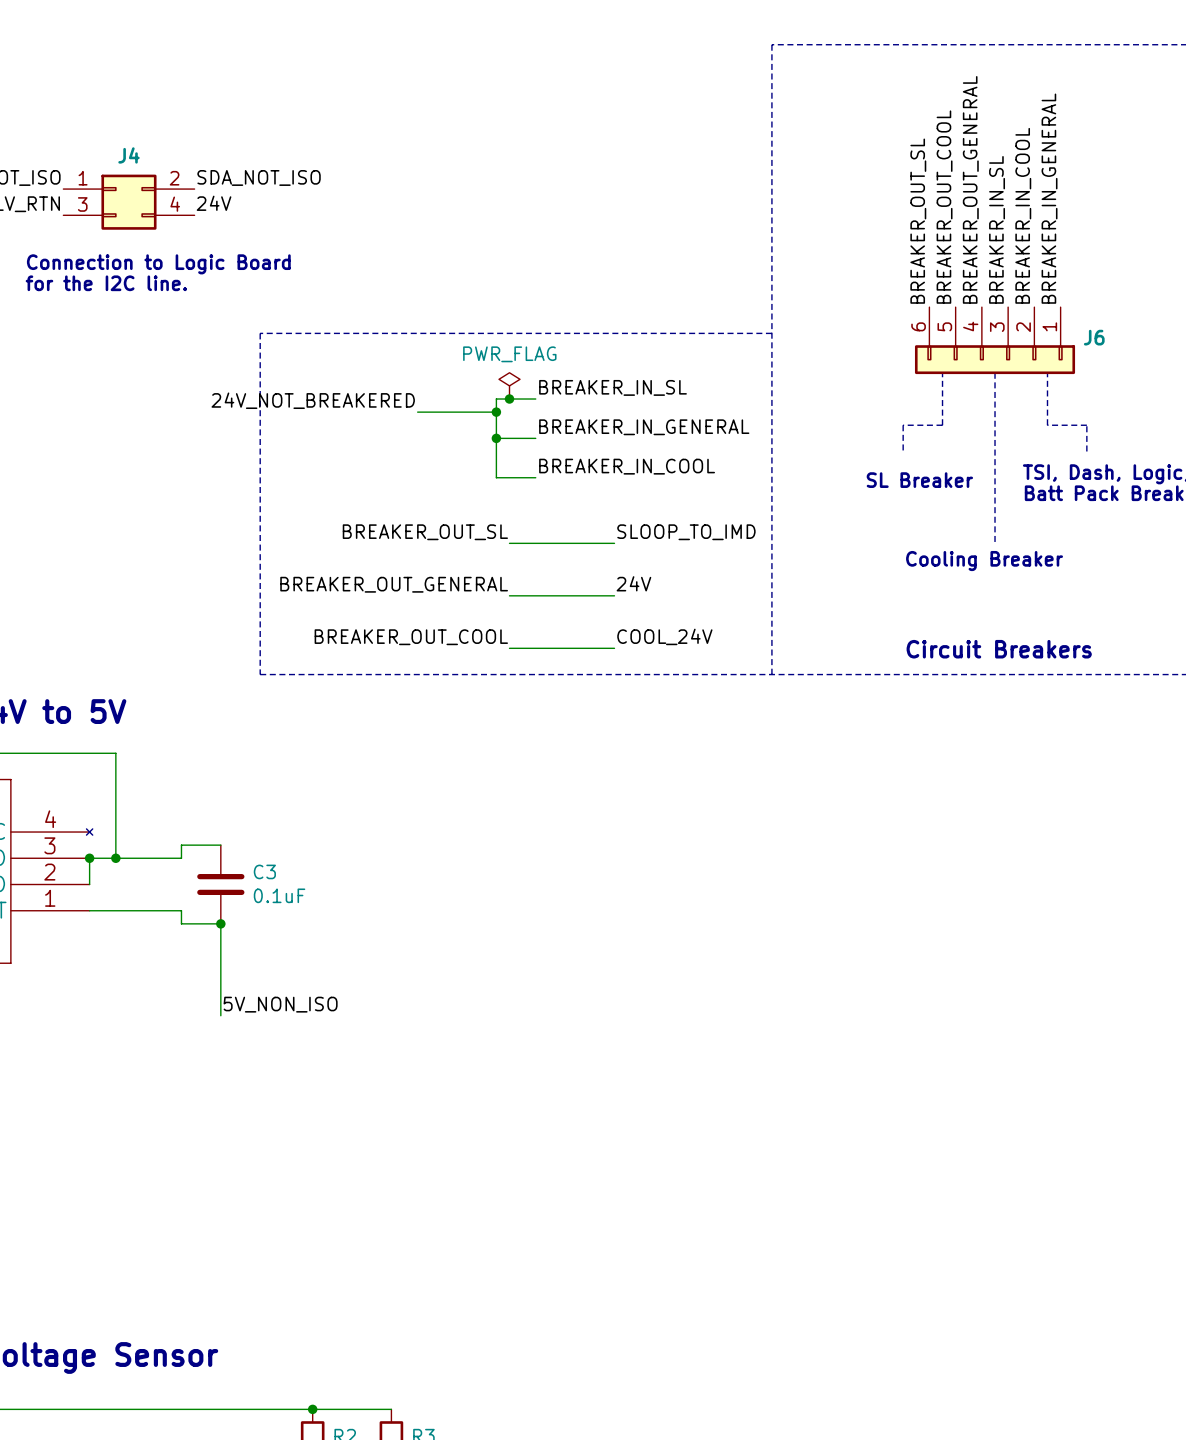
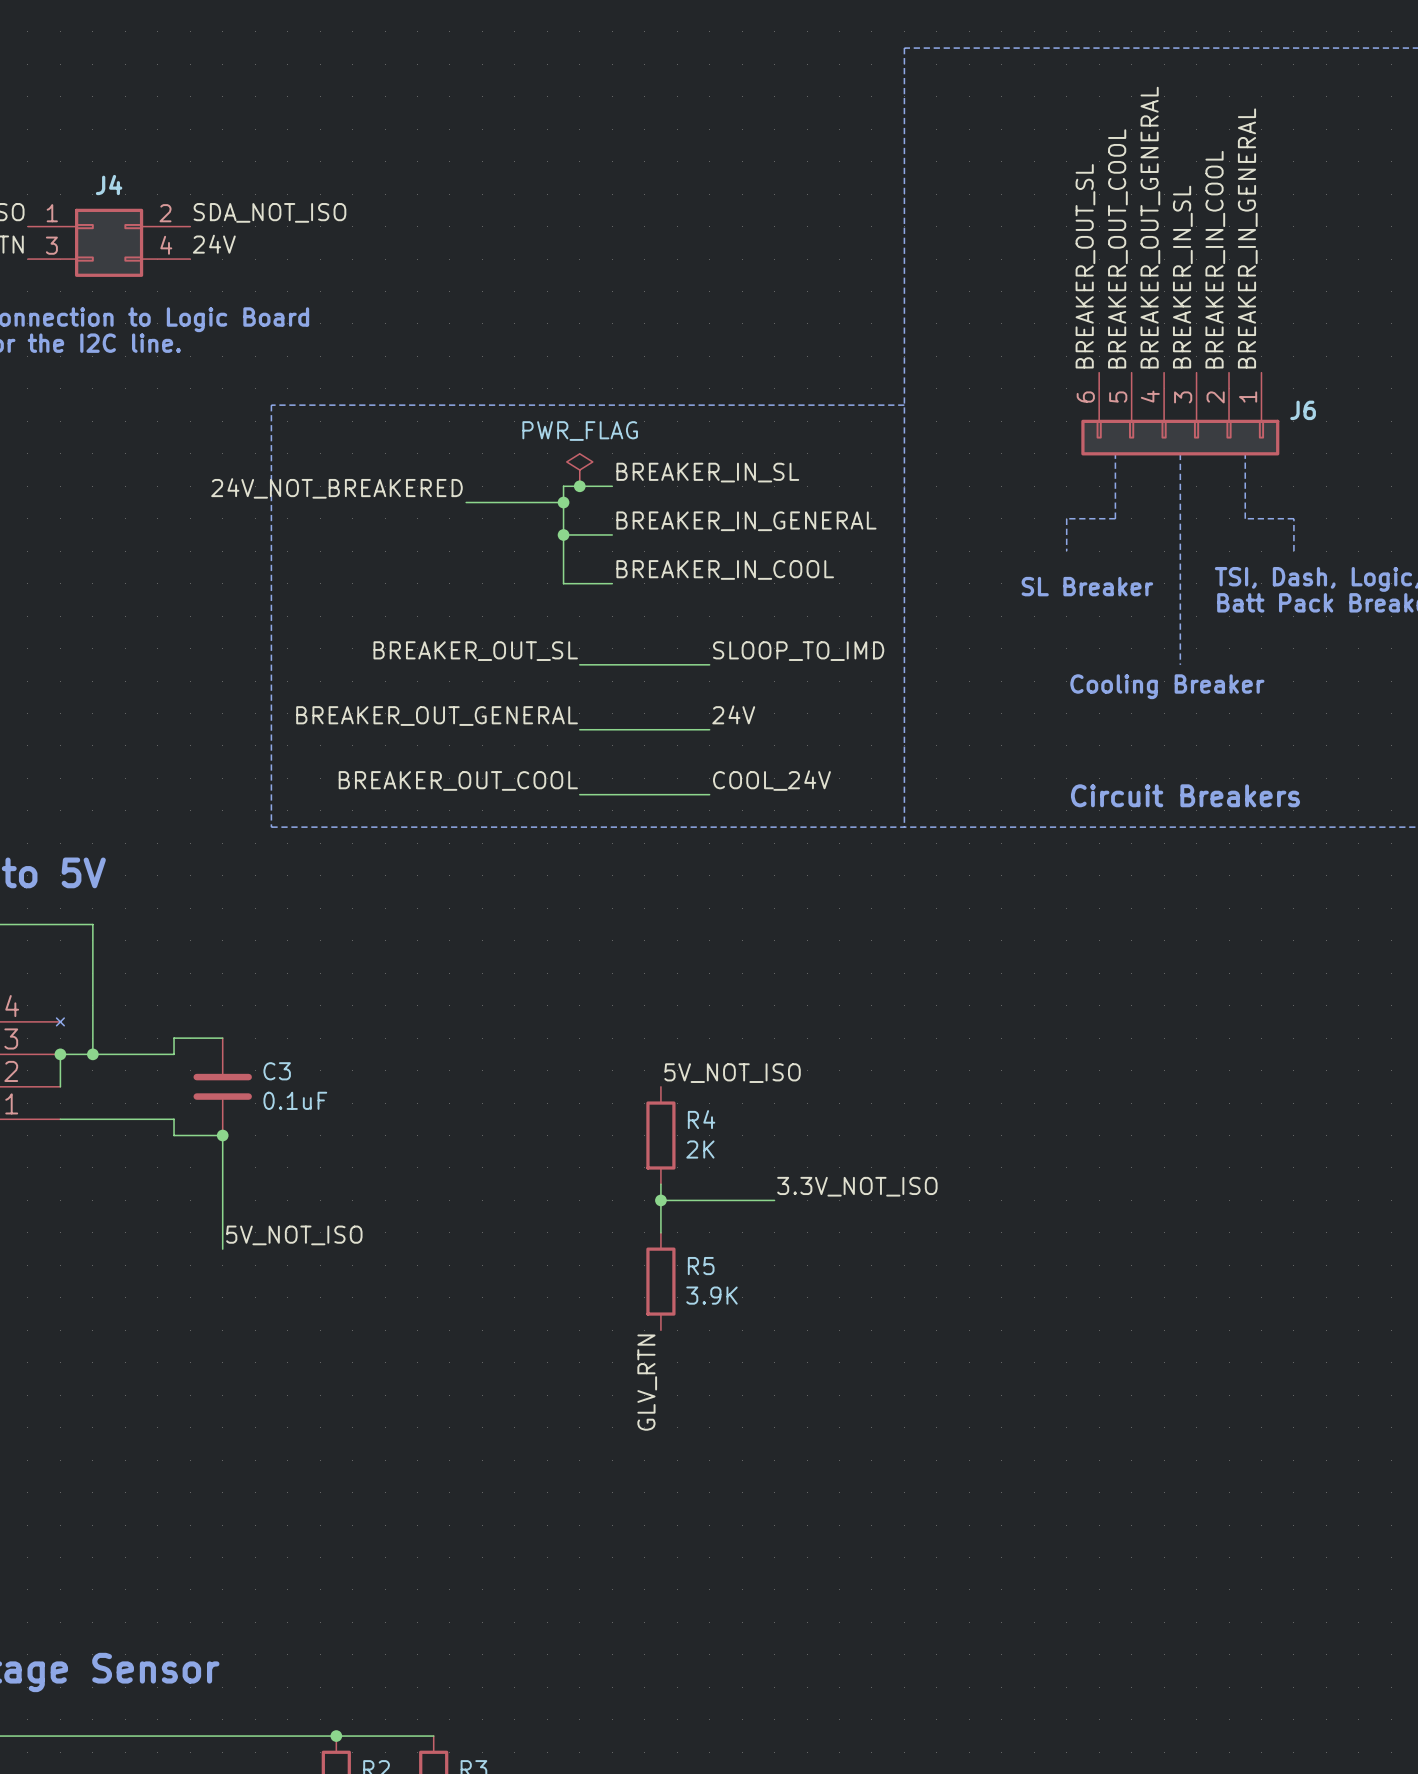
label: none -> 5V_NOT_ISO (732, 1073)
R4: none -> 2K (660, 1135)
wire: none -> (660, 1184) (660, 1232)
label: none -> 3.3V_NOT_ISO (857, 1186)
wire: none -> (660, 1200) (774, 1200)
junction: none -> (660, 1200)
label: 5V_NON_ISO (280, 1004) -> 5V_NOT_ISO (294, 1235)
R5: none -> 3.9K (660, 1281)
label: none -> GLV_RTN (647, 1382)

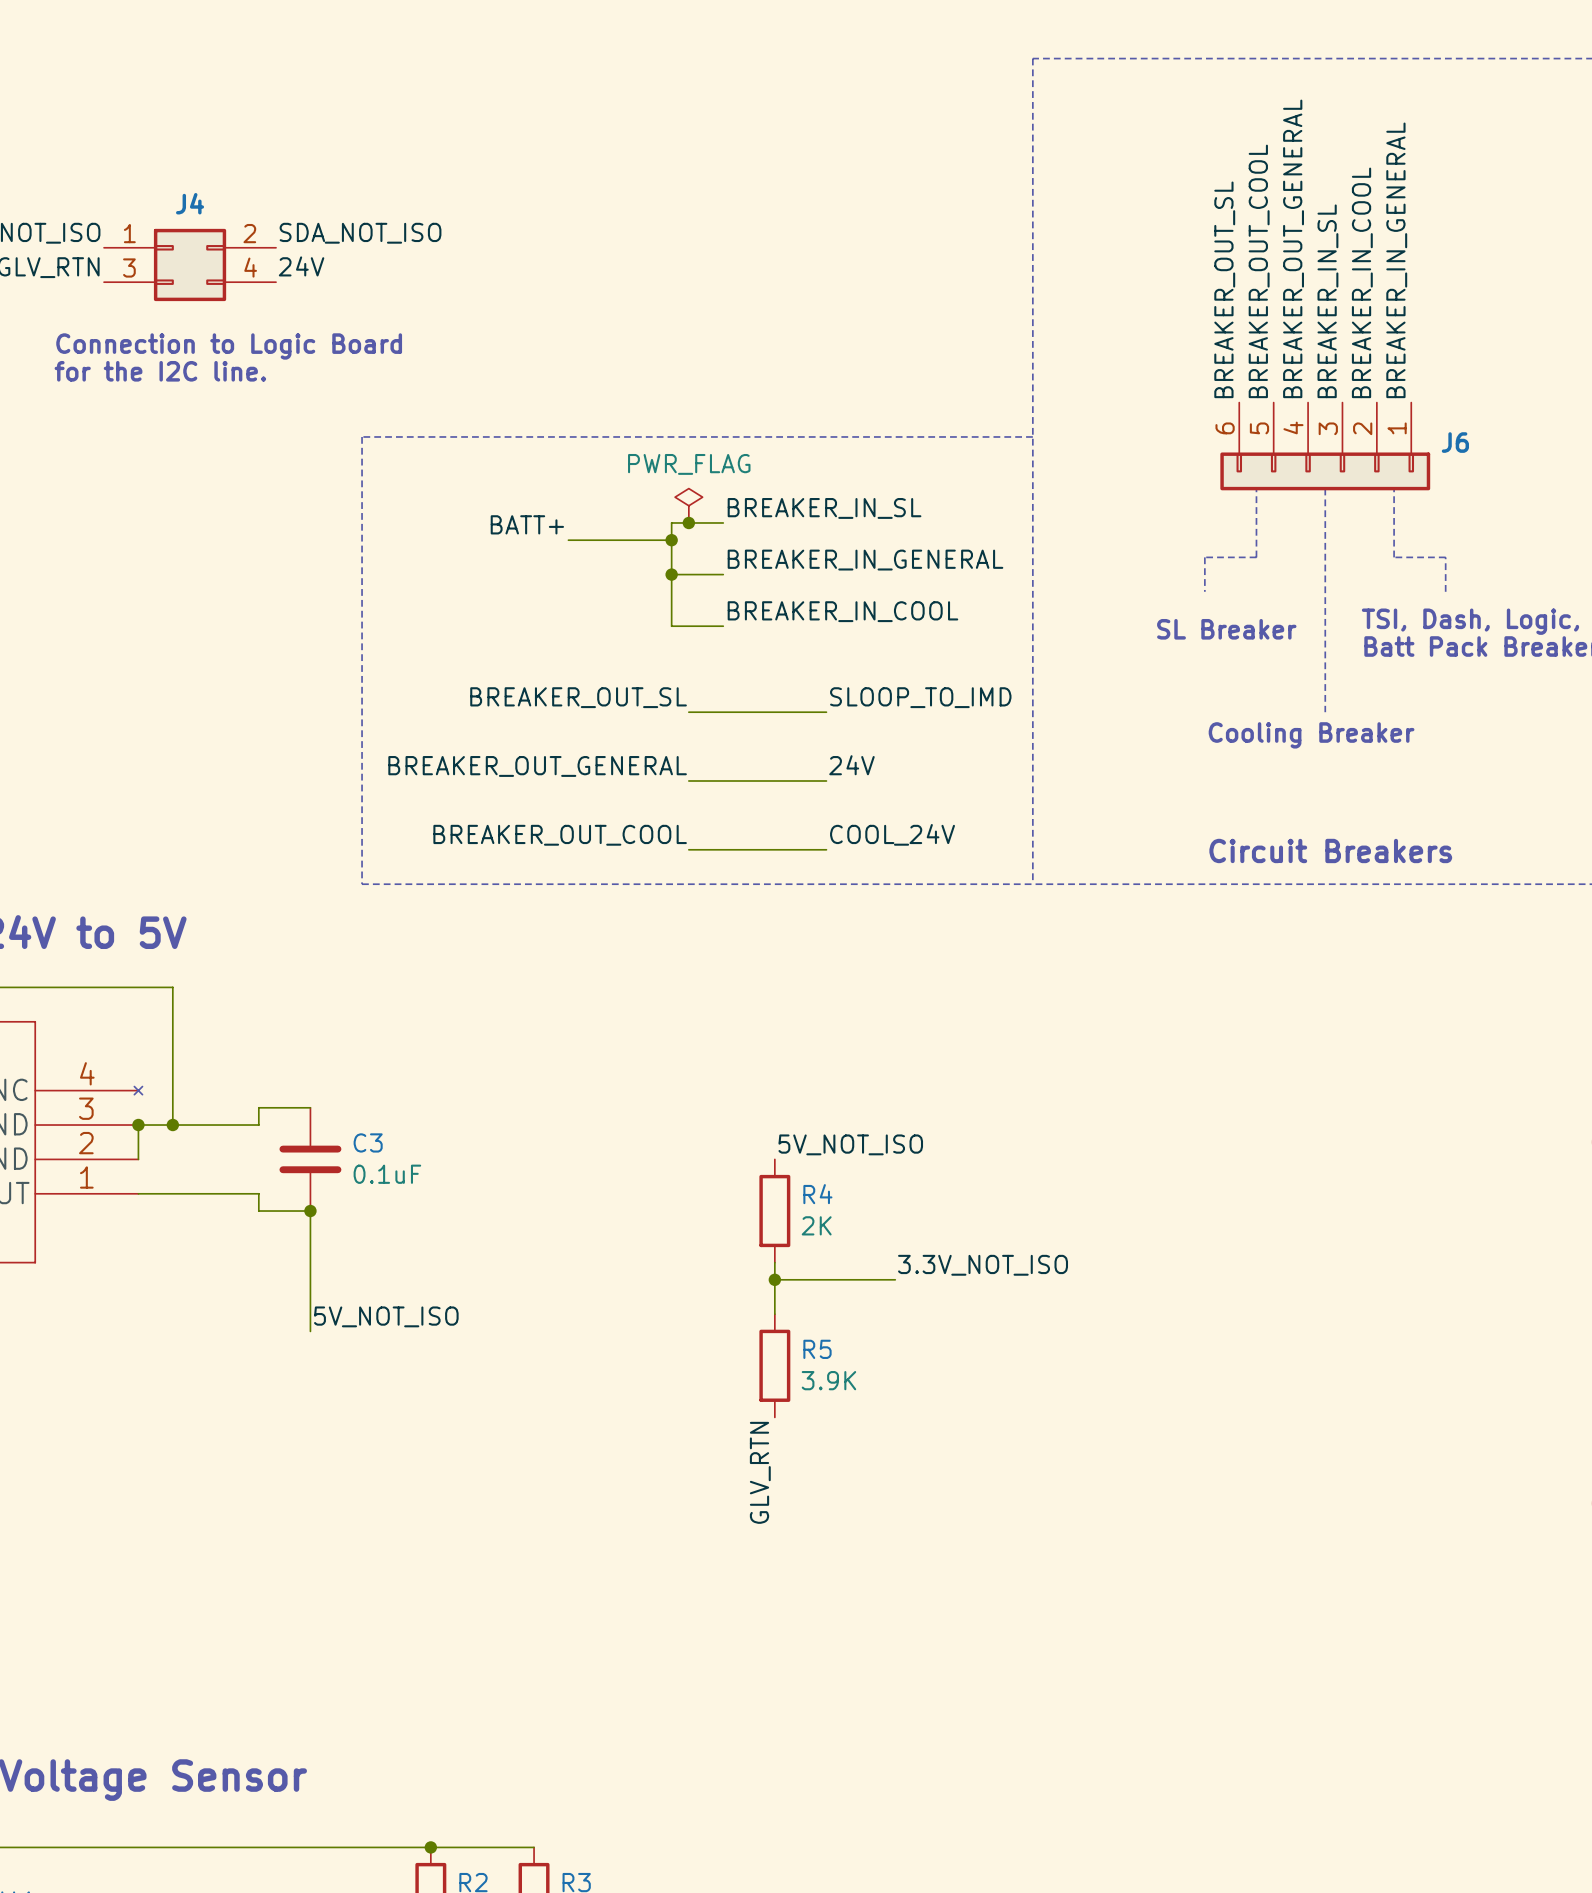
label: 24V_NOT_BREAKERED (336, 488) -> BATT+ (527, 524)

